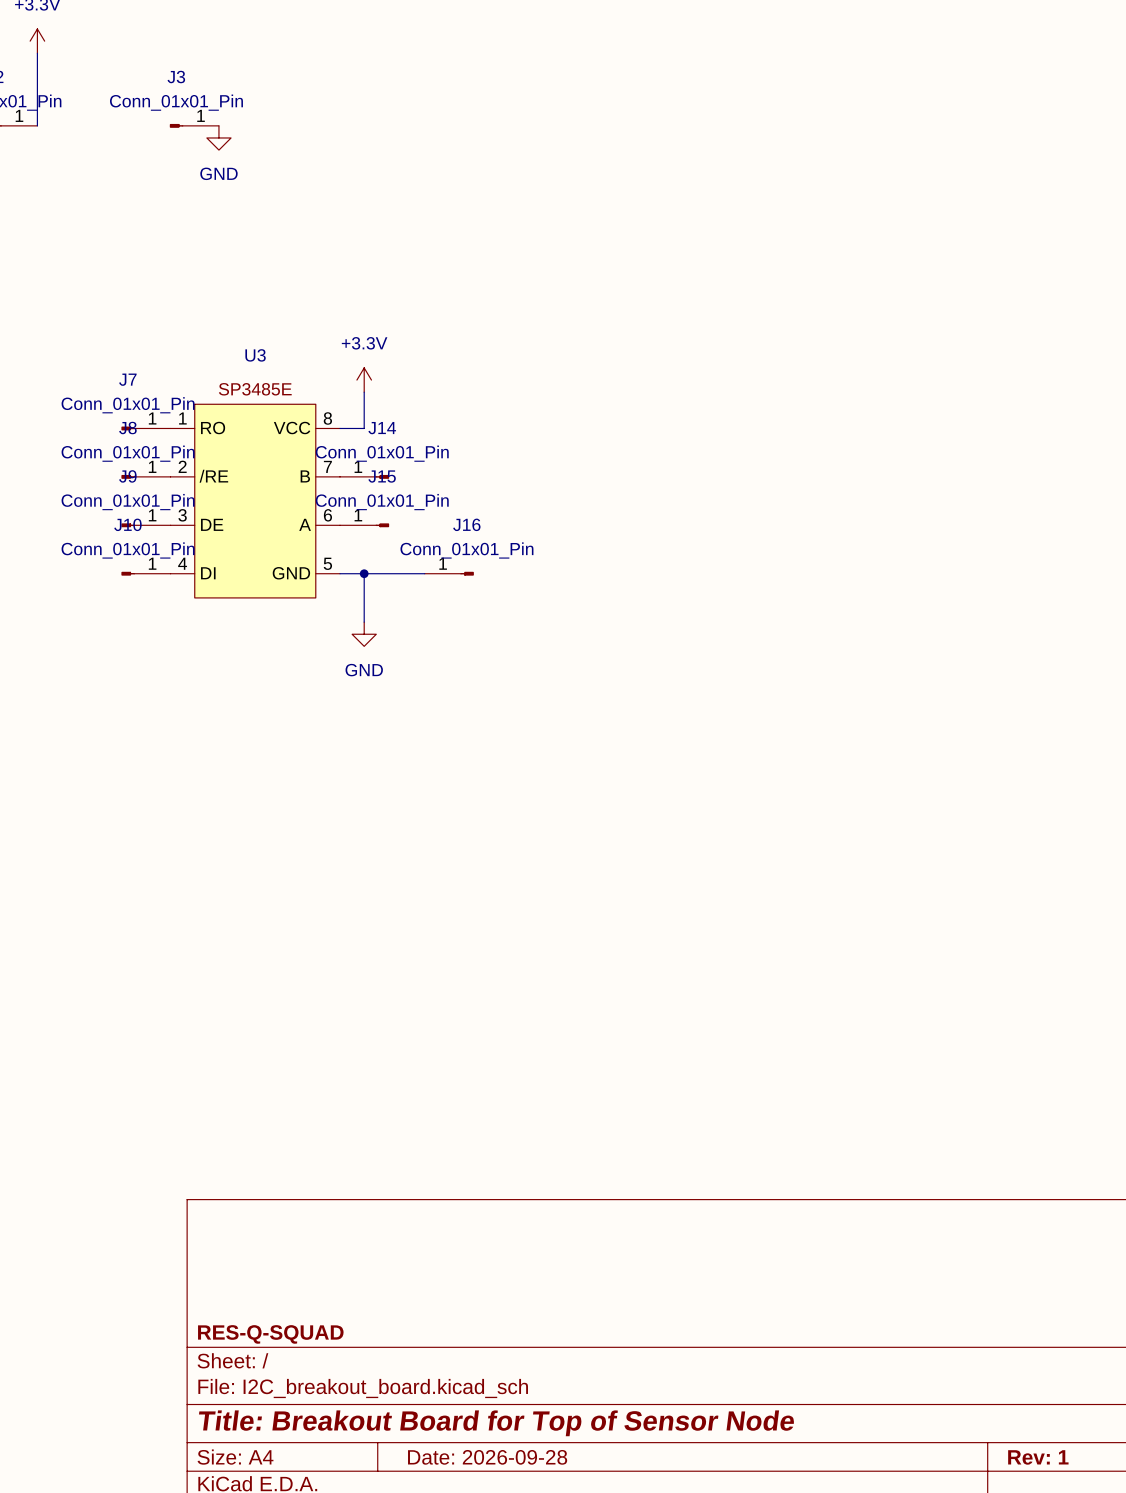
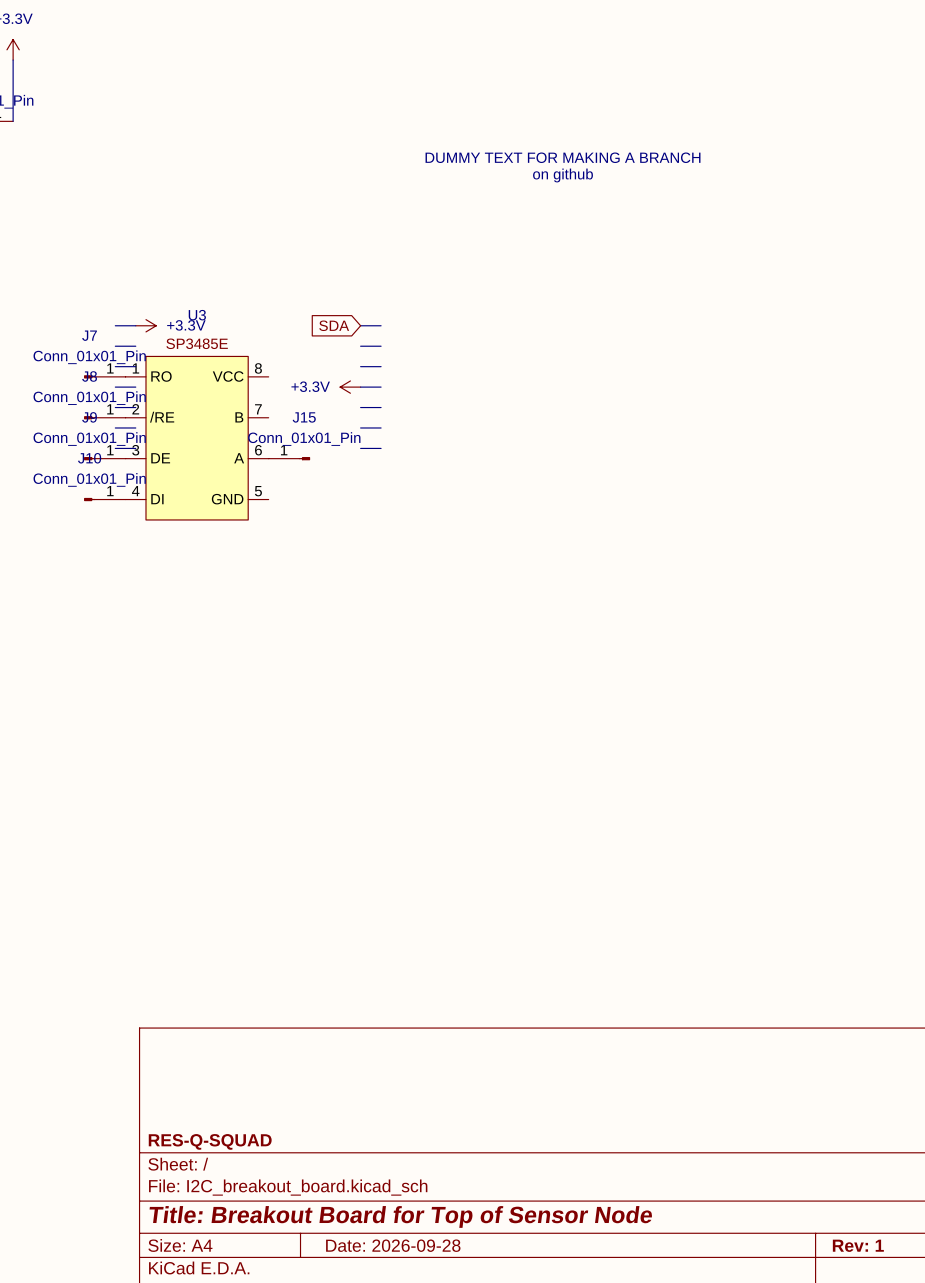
J3: Conn_01x01_Pin (194, 125) -> none
power symbol: GND (218, 137) -> none
text: none -> DUMMY TEXT FOR MAKING A BRANCH (563, 157)
text: none -> on github (563, 175)
wire: none -> (115, 325) (135, 325)
power symbol: none -> +3.3V (145, 325)
global label: none -> SDA (334, 325)
wire: none -> (360, 325) (381, 325)
power symbol: +3.3V (364, 380) -> none
wire: none -> (115, 346) (135, 346)
wire: (364, 392) (364, 428) (339, 428) -> none
wire: none -> (360, 346) (381, 346)
wire: none -> (115, 366) (135, 366)
wire: none -> (360, 366) (381, 366)
wire: none -> (115, 387) (135, 387)
power symbol: none -> +3.3V (350, 387)
wire: none -> (360, 387) (381, 387)
wire: none -> (115, 407) (135, 407)
wire: none -> (360, 407) (381, 407)
J14: Conn_01x01_Pin (364, 476) -> none
wire: none -> (115, 427) (135, 427)
wire: none -> (360, 427) (381, 427)
wire: none -> (115, 448) (135, 448)
wire: none -> (360, 448) (381, 448)
wire: (339, 573) (424, 573) -> none
wire: (364, 573) (364, 622) -> none
junction: (364, 573) -> none
J16: Conn_01x01_Pin (449, 573) -> none
power symbol: GND (364, 634) -> none

